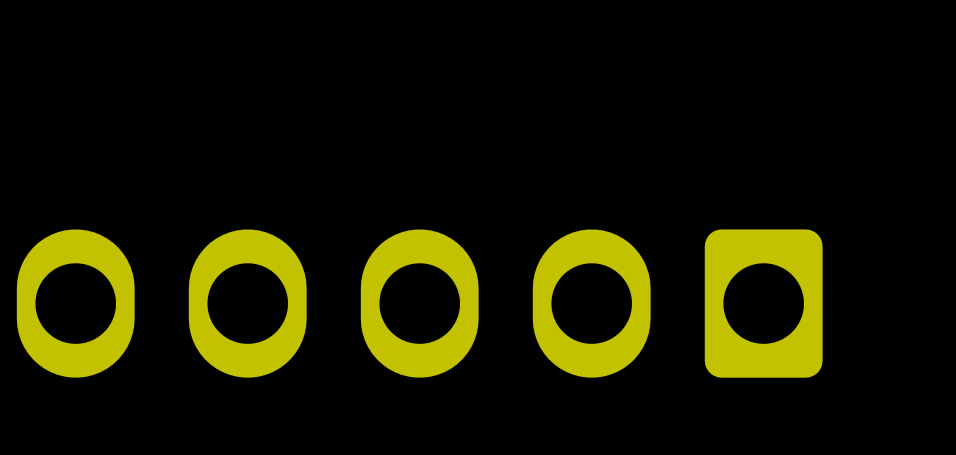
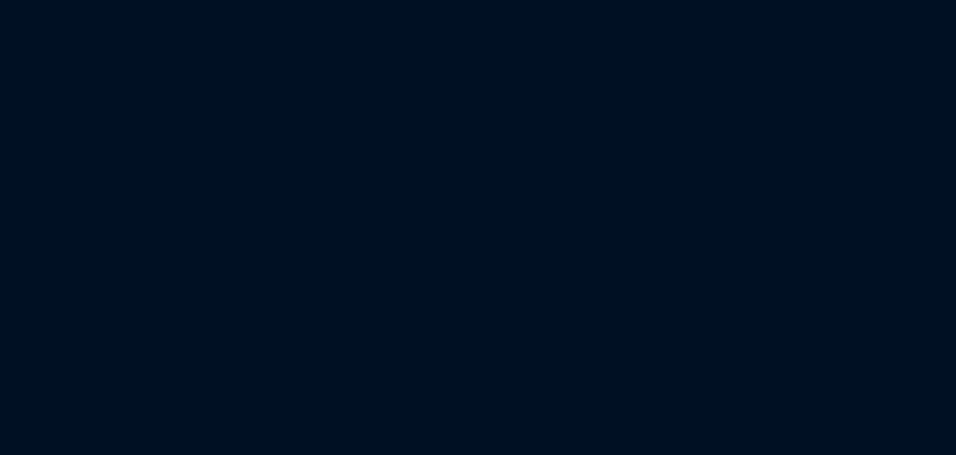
part: (419, 303) -> none

